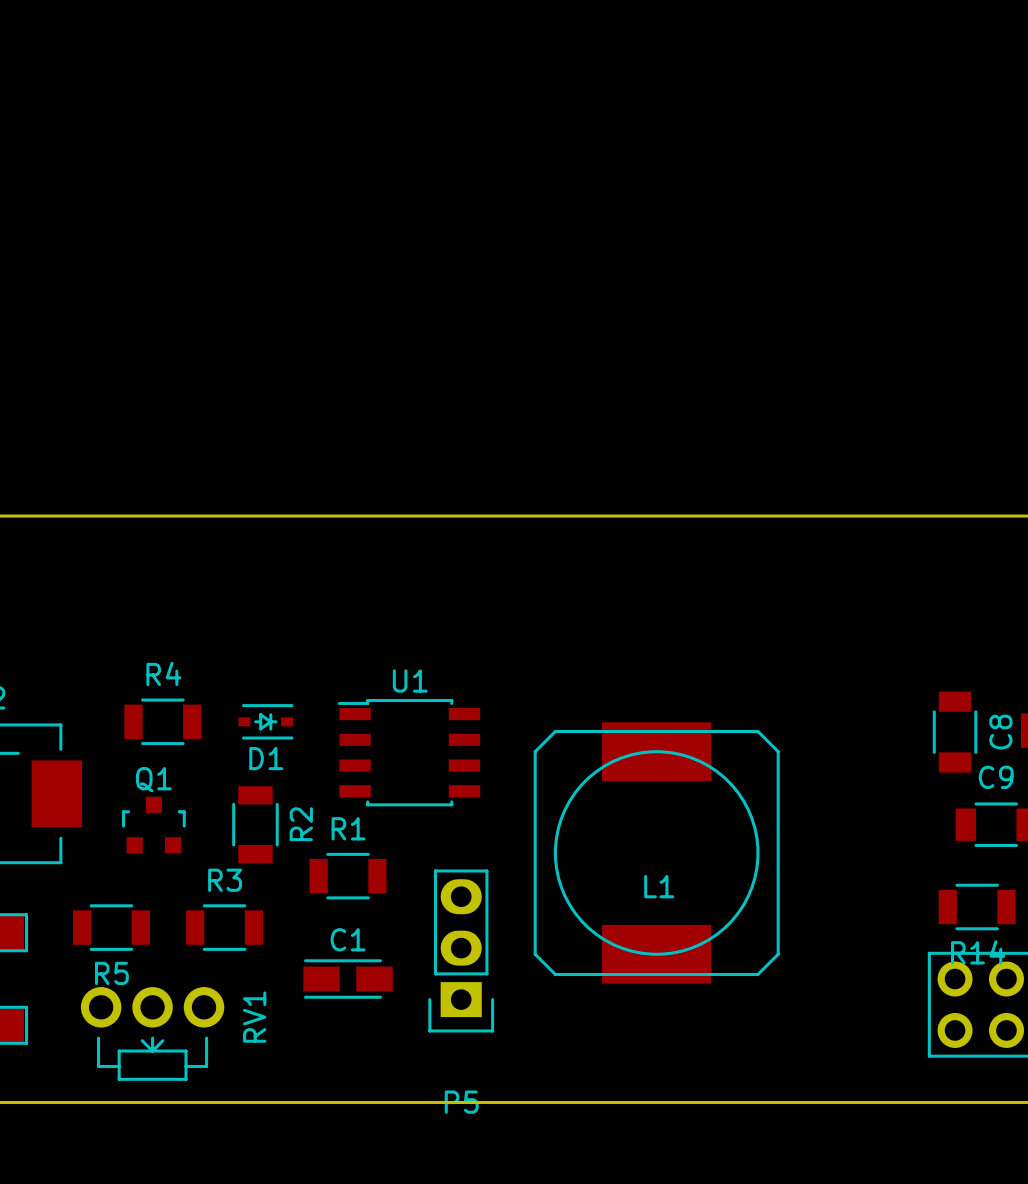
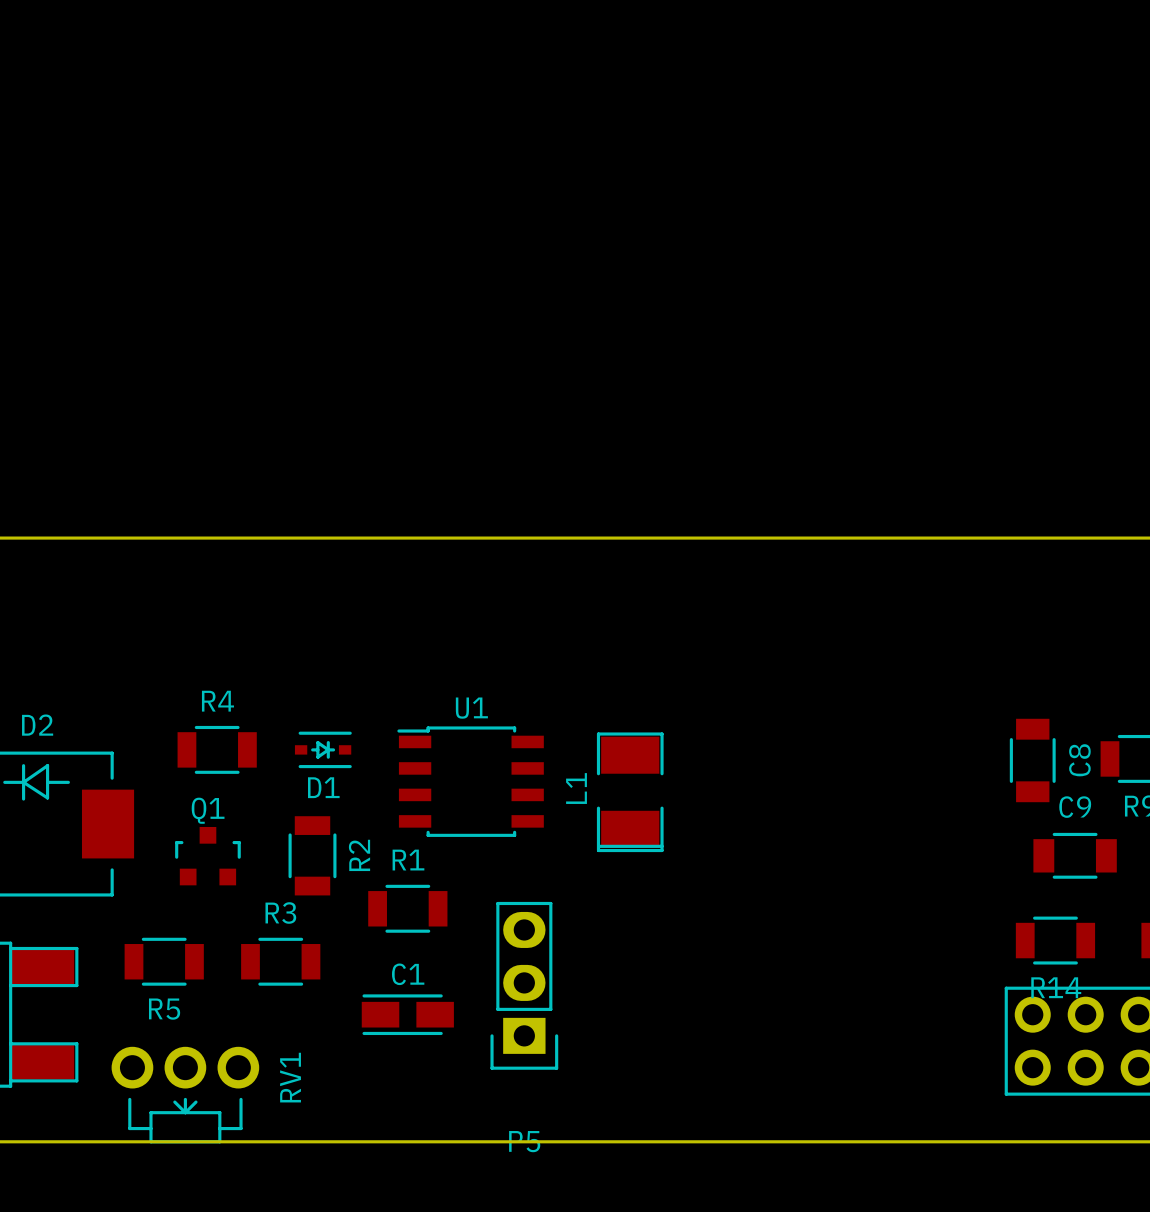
L1 footprint: [533, 722, 780, 984] -> [596, 732, 664, 853]
L1 name position: L1 (659, 886) -> L1 (576, 788)
RV1 position: (152, 1033) -> (185, 1095)

